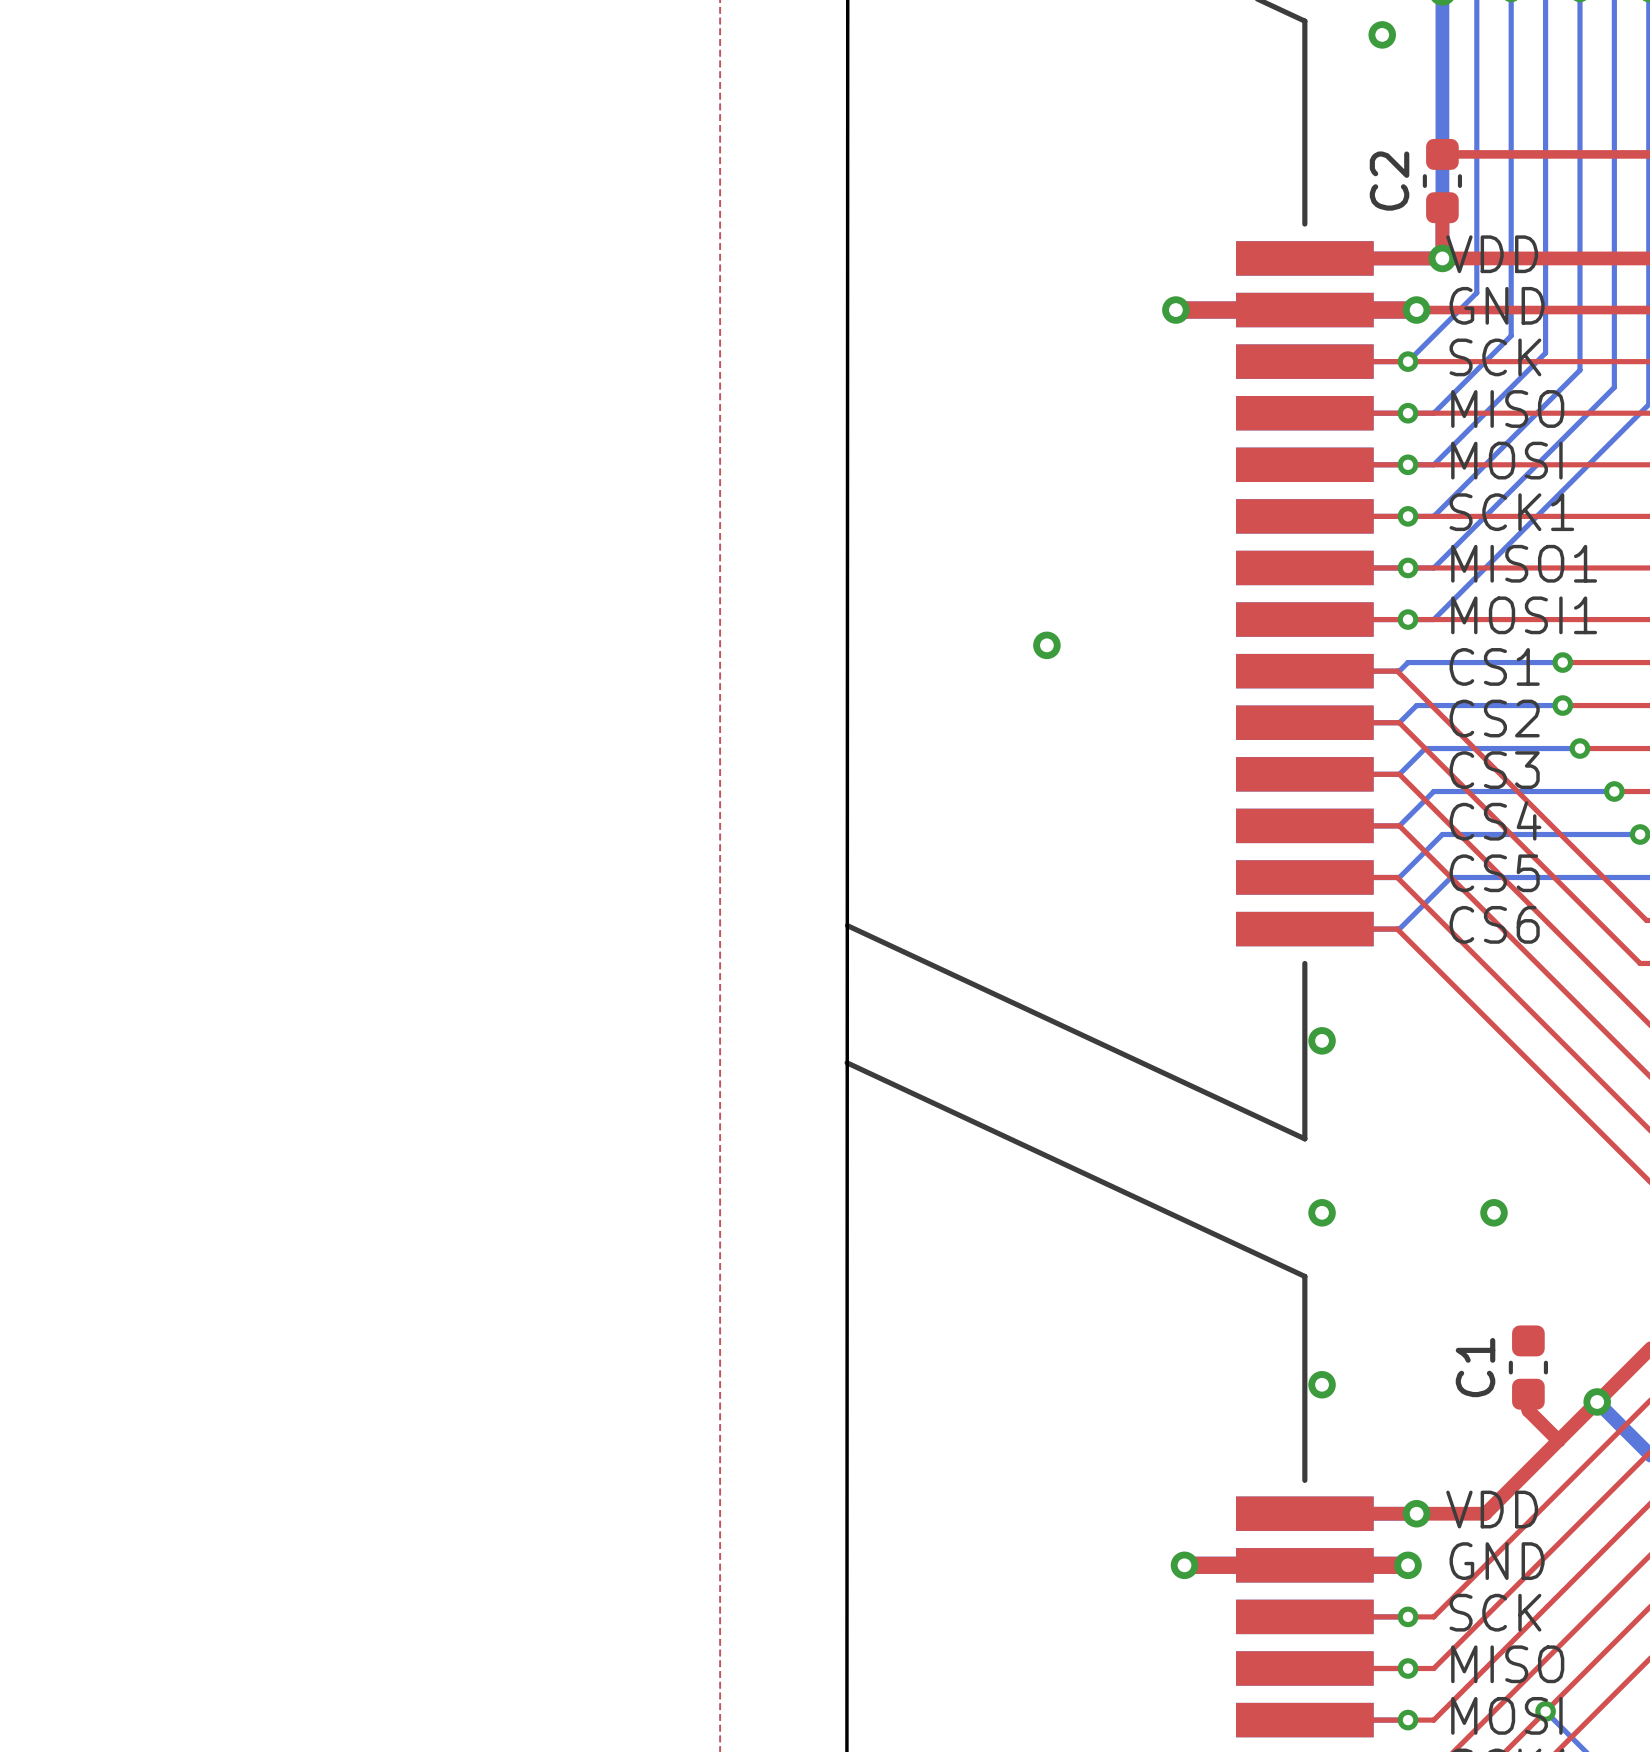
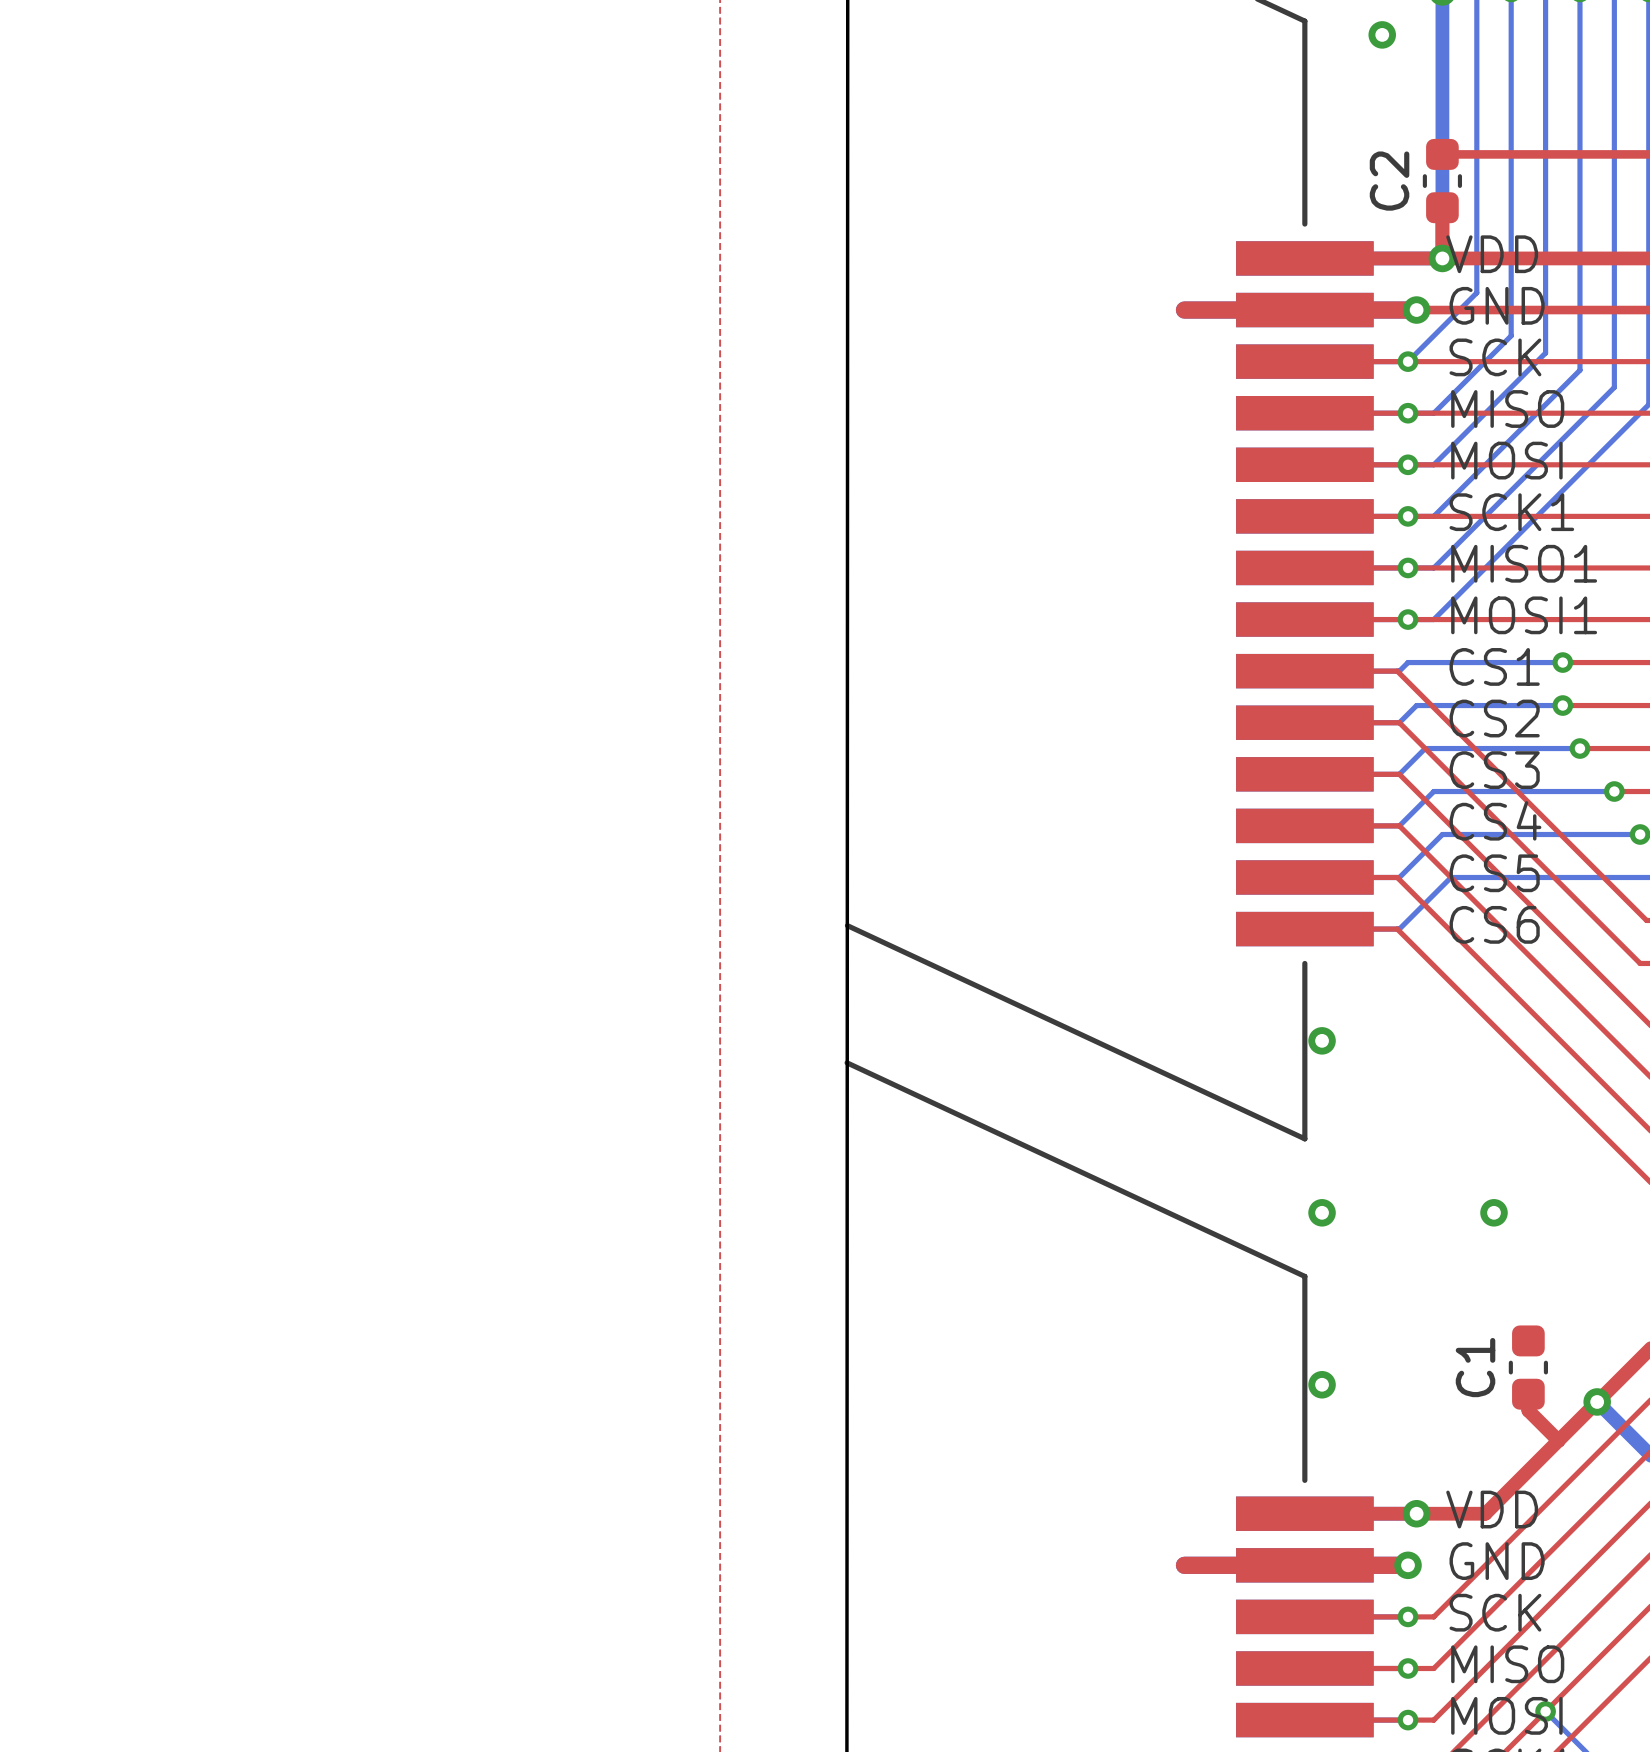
via: (1175, 310) -> none
via: (1046, 645) -> none
via: (1184, 1565) -> none

